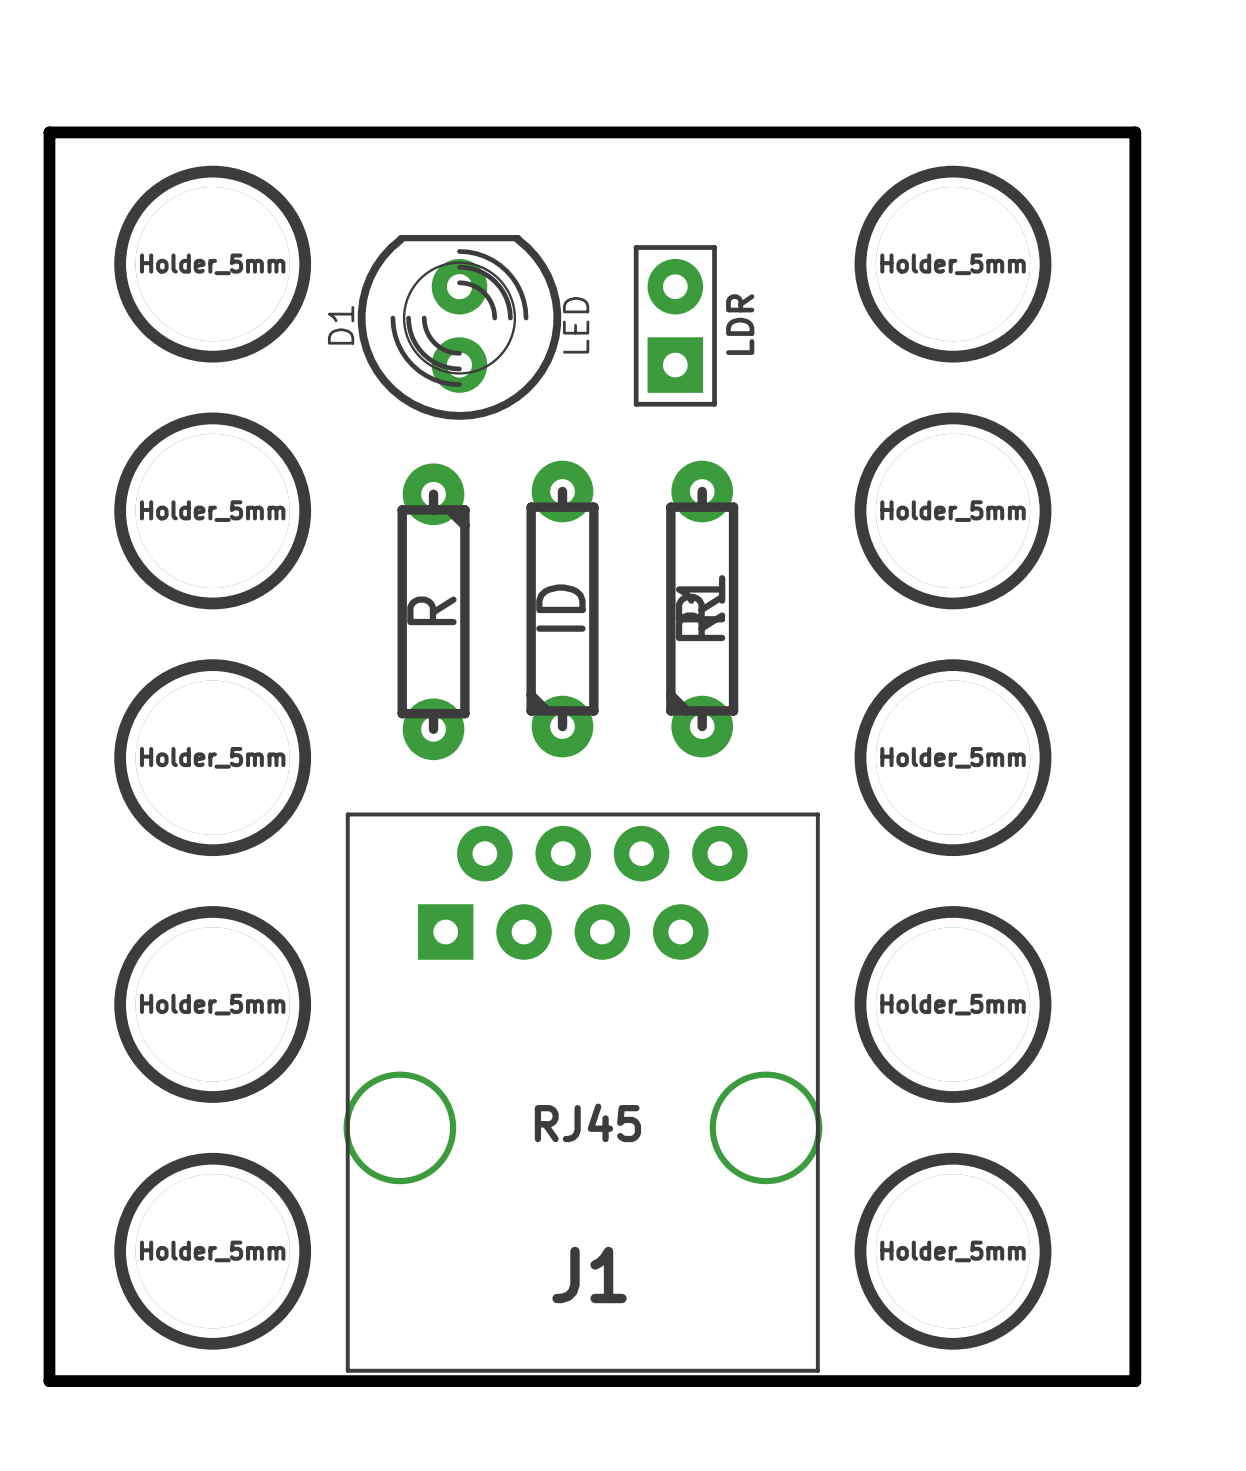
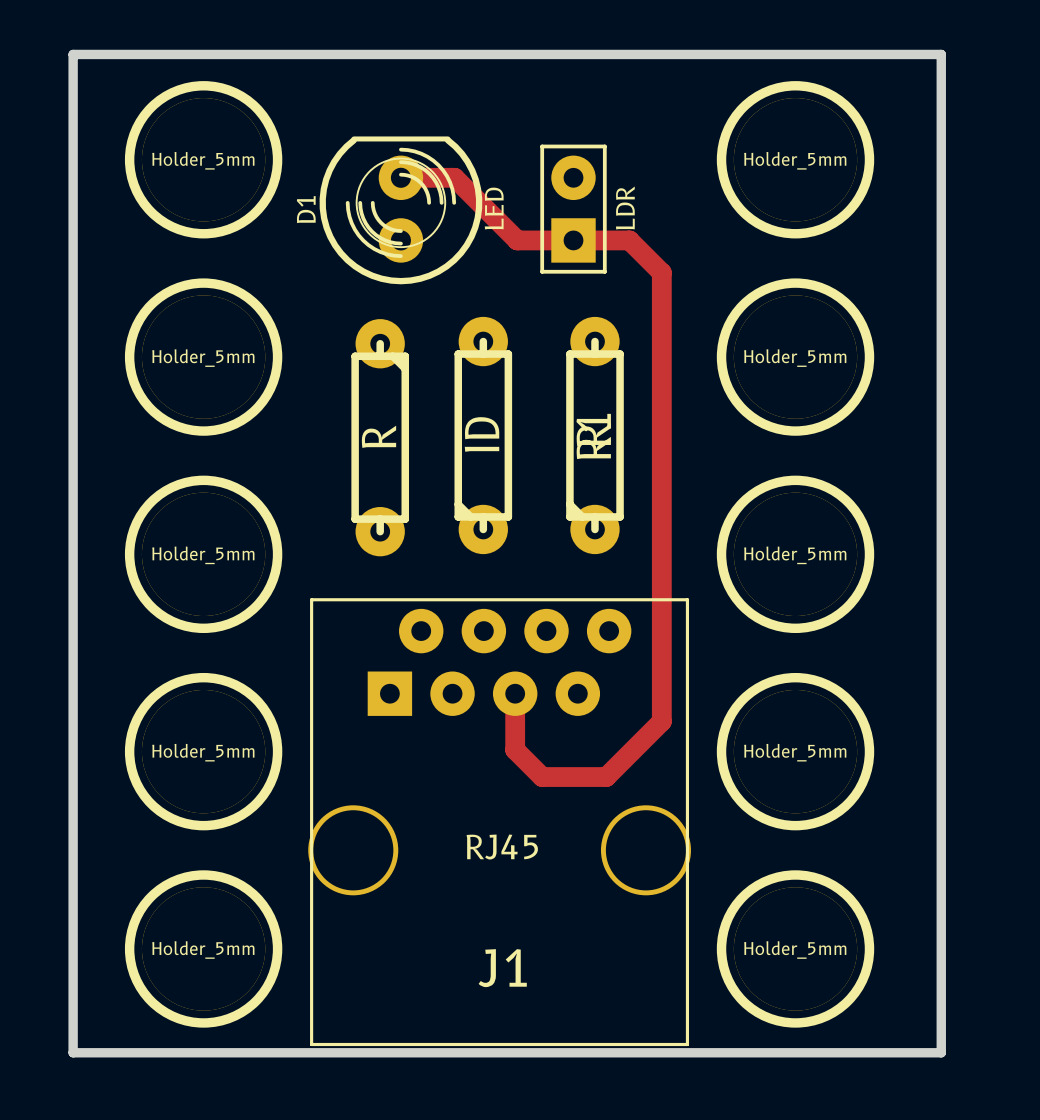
track: none -> (400, 177) (454, 177) (517, 240) (629, 240) (661, 272) (661, 721) (606, 777) (542, 777) (515, 749) (515, 693)

